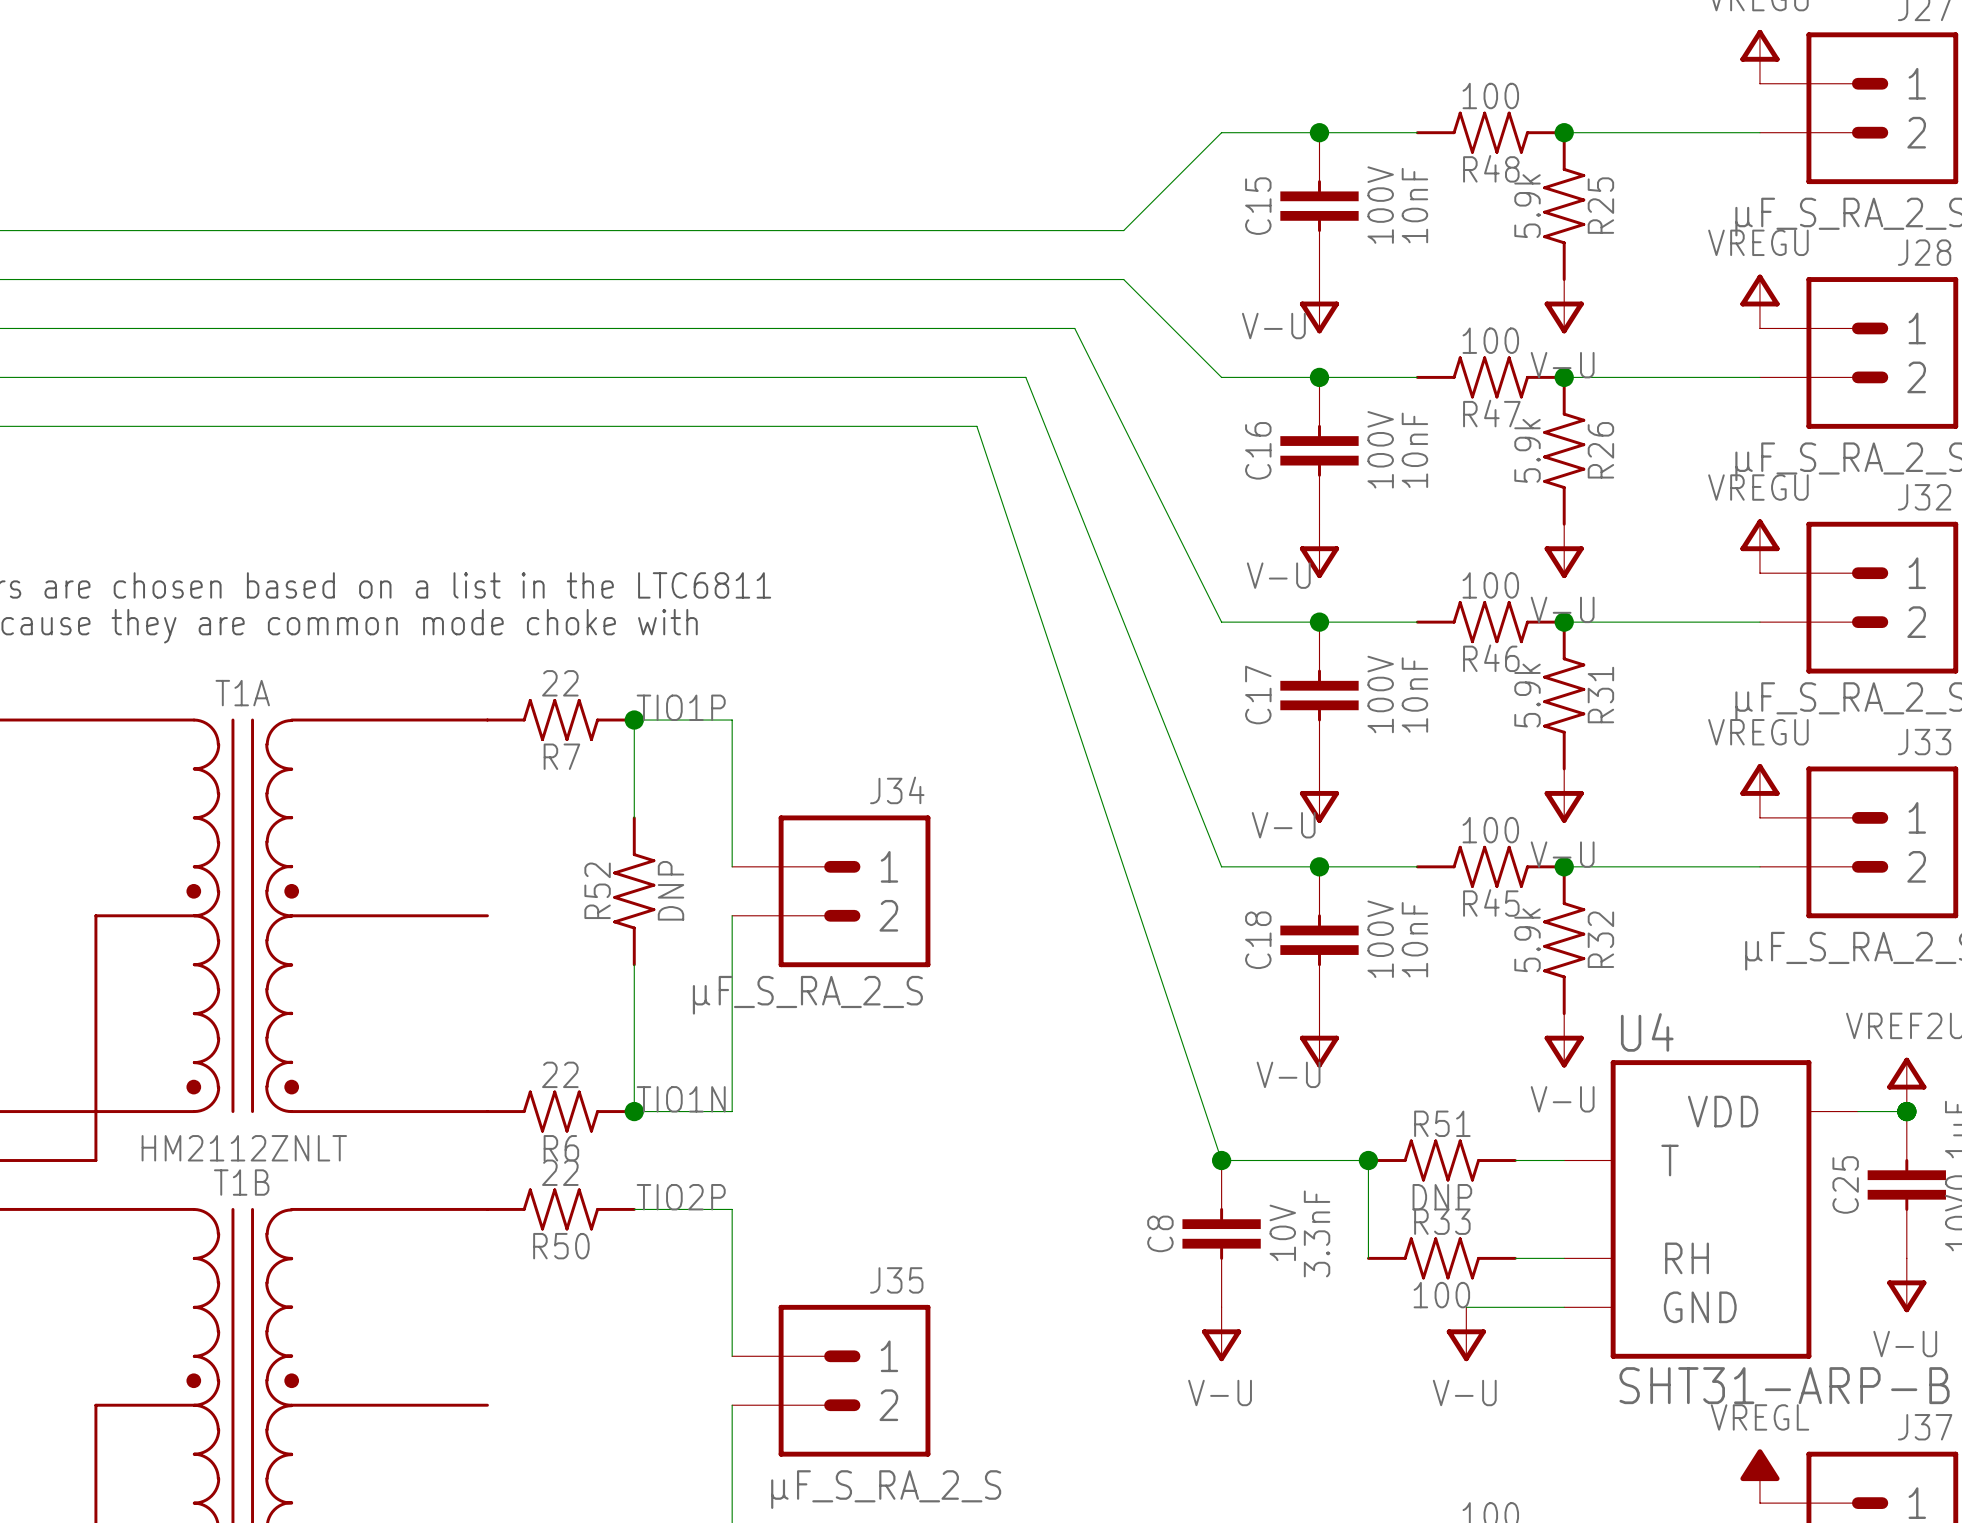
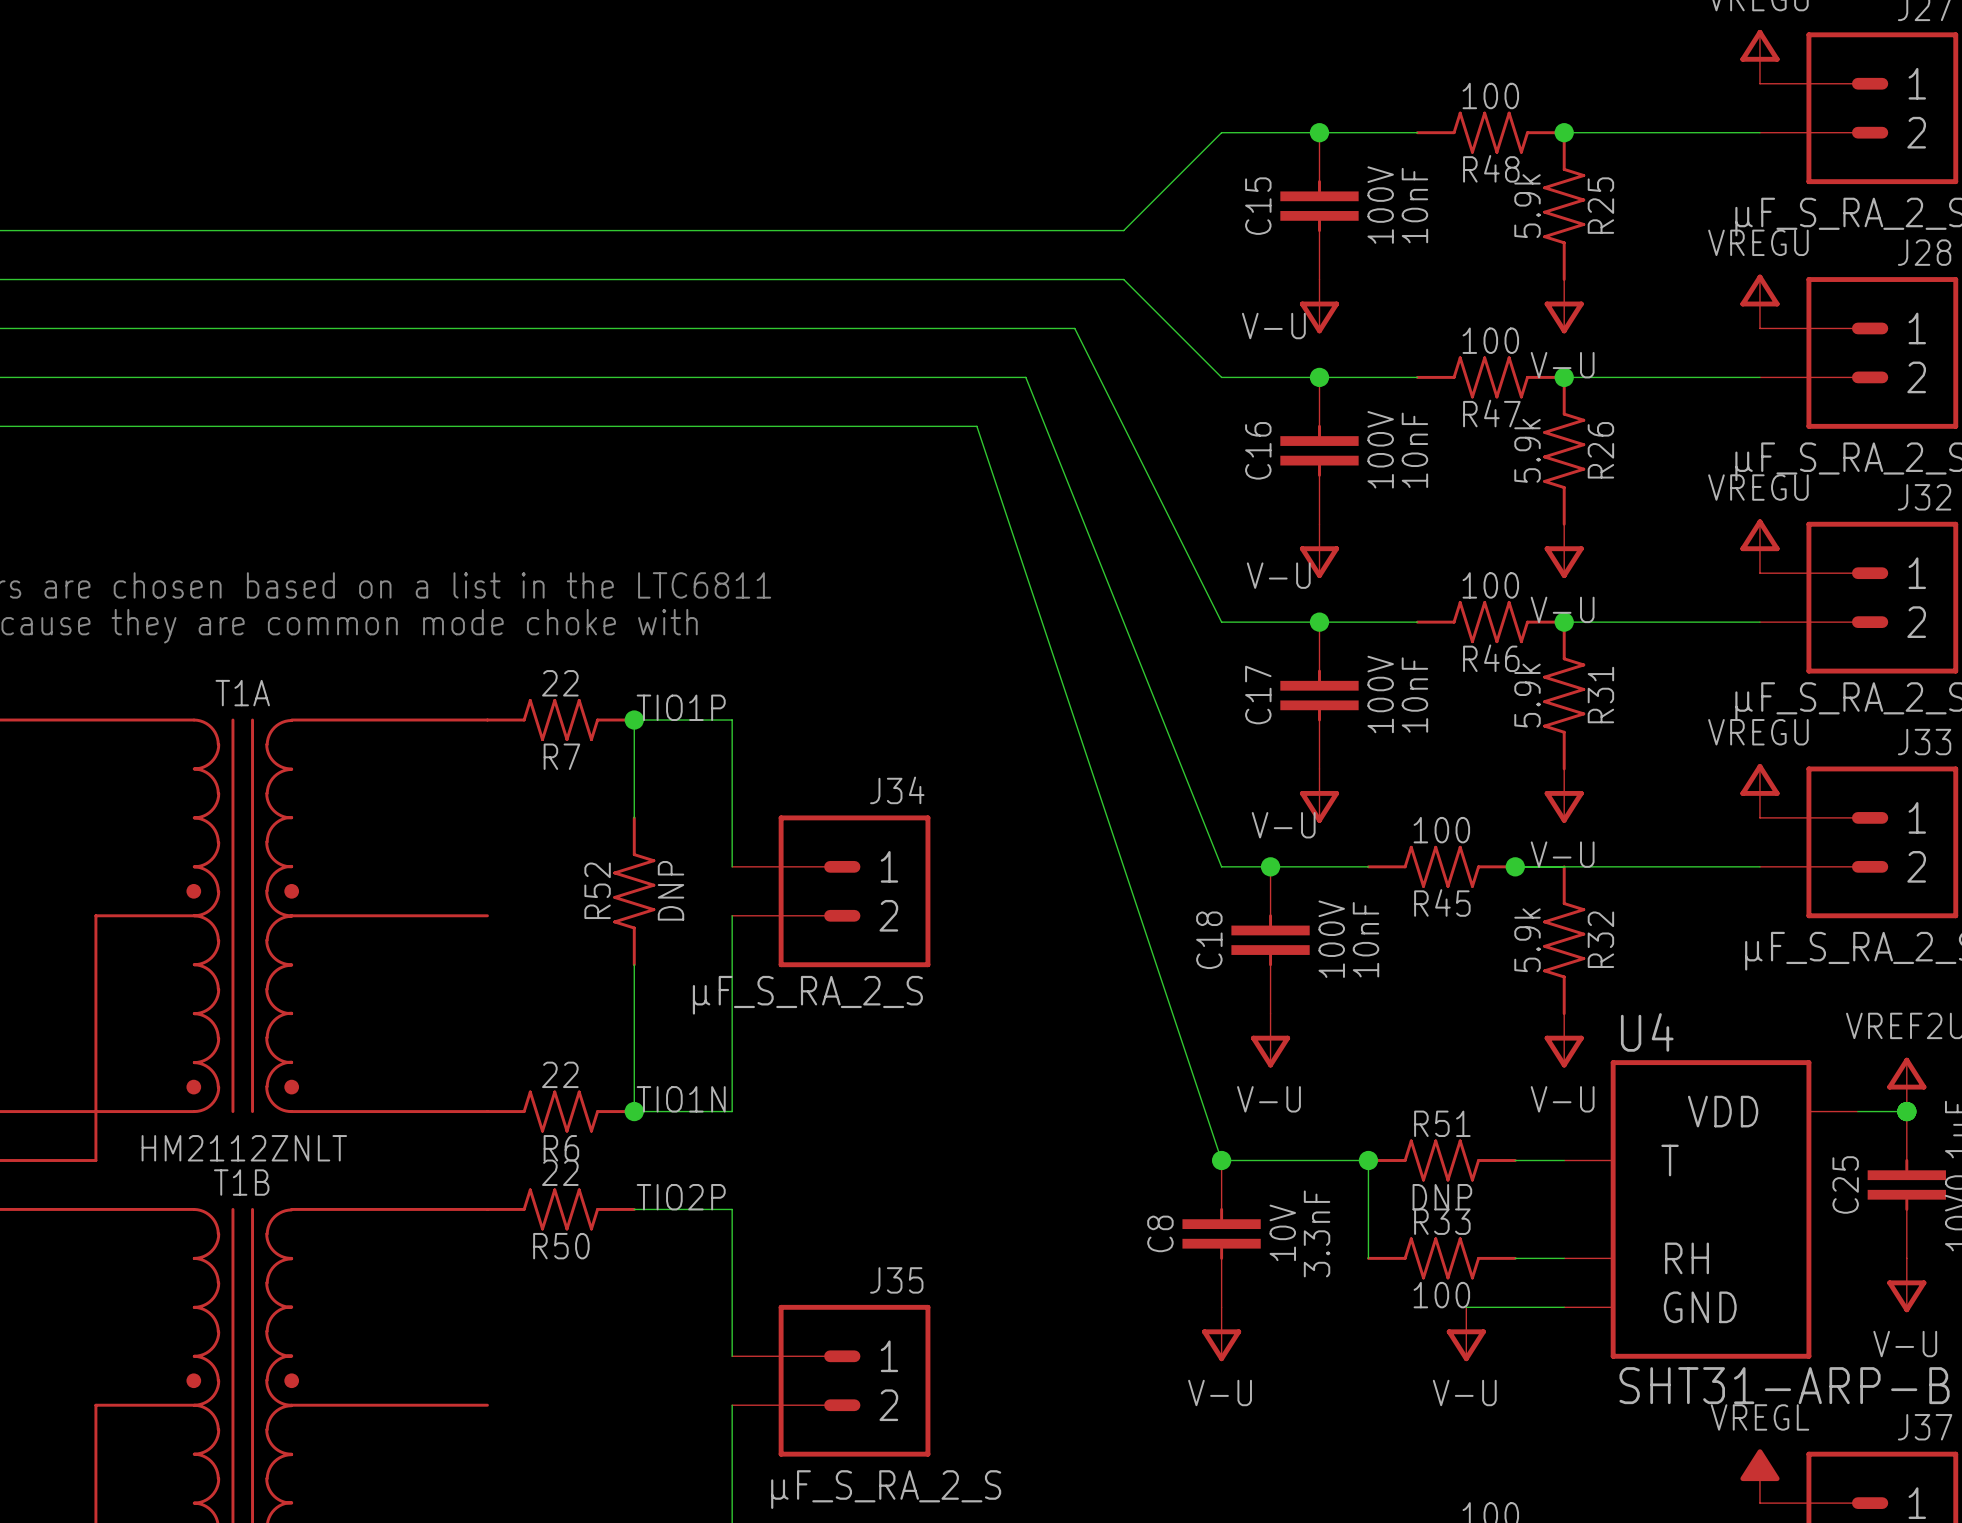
junction position: (1319, 866) -> (1270, 866)
R45 position: (1490, 866) -> (1441, 866)
junction position: (1564, 866) -> (1515, 866)
C18 position: (1319, 940) -> (1270, 940)
power symbol position: V-U (1319, 1040) -> V-U (1270, 1040)
power symbol text position: V-U (1288, 1074) -> V-U (1268, 1099)

